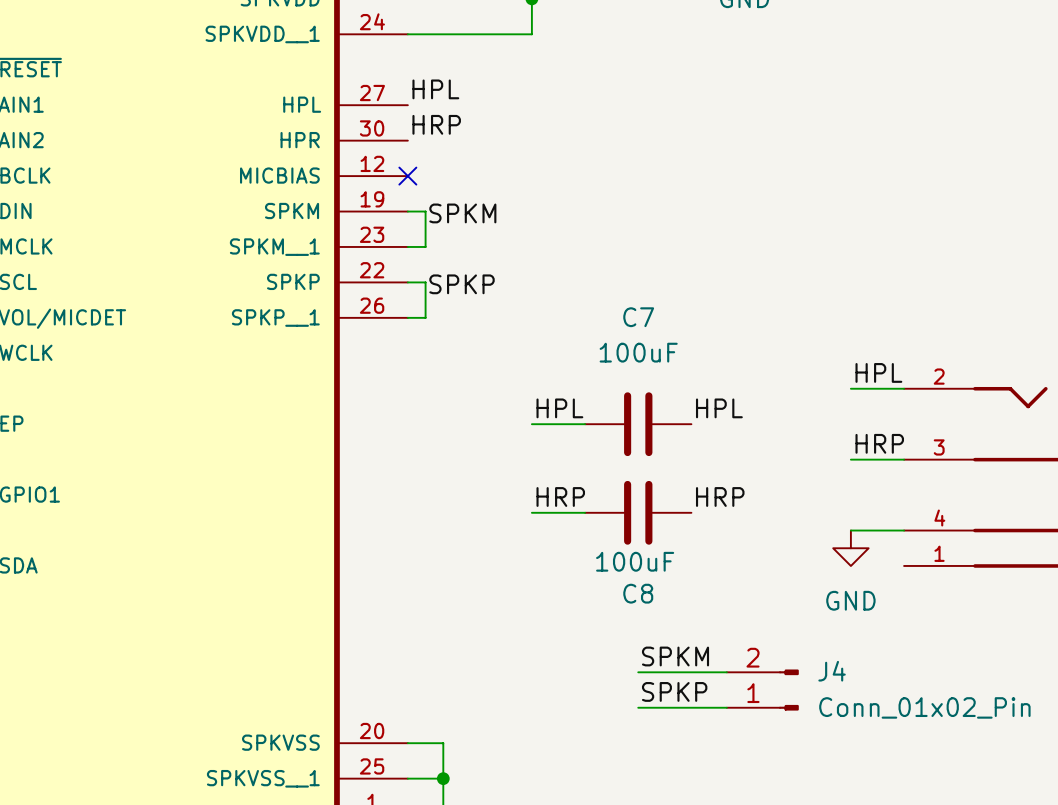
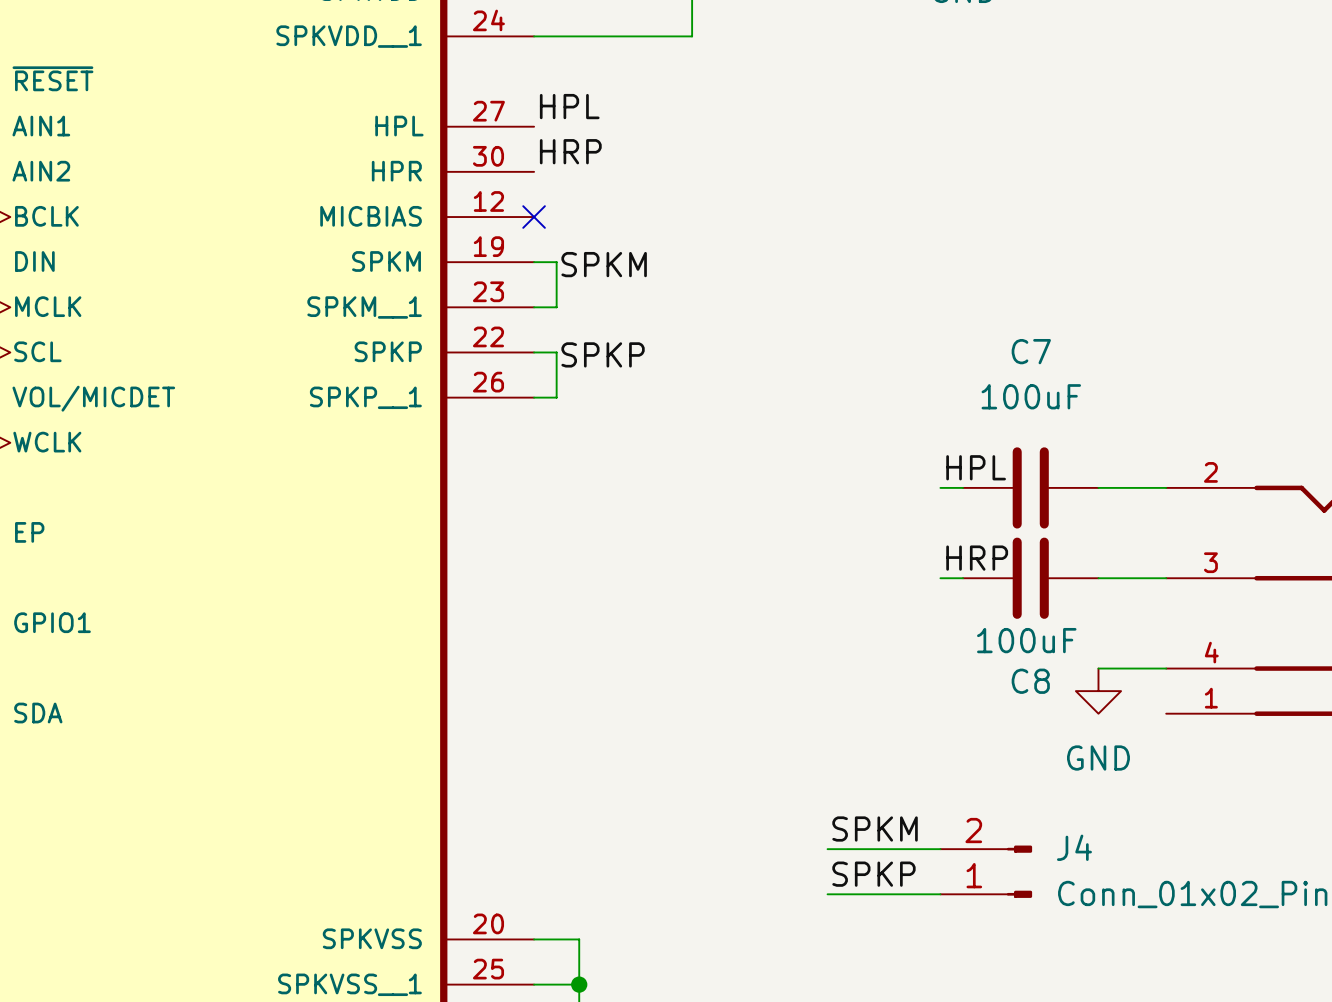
label: HPL (878, 372) -> none
wire: none -> (940, 487) (963, 487)
label: HPL (559, 408) -> none
label position: HPL (719, 408) -> HPL (976, 467)
wire: (531, 424) (585, 424) -> none
C7 position: (638, 424) -> (1030, 487)
label: none -> HRP (977, 558)
label: HRP (879, 443) -> none
wire: none -> (940, 578) (963, 578)
label: HRP (560, 496) -> none
label: HRP (720, 496) -> none
wire: (531, 512) (585, 512) -> none
C8 position: (638, 512) -> (1030, 578)

